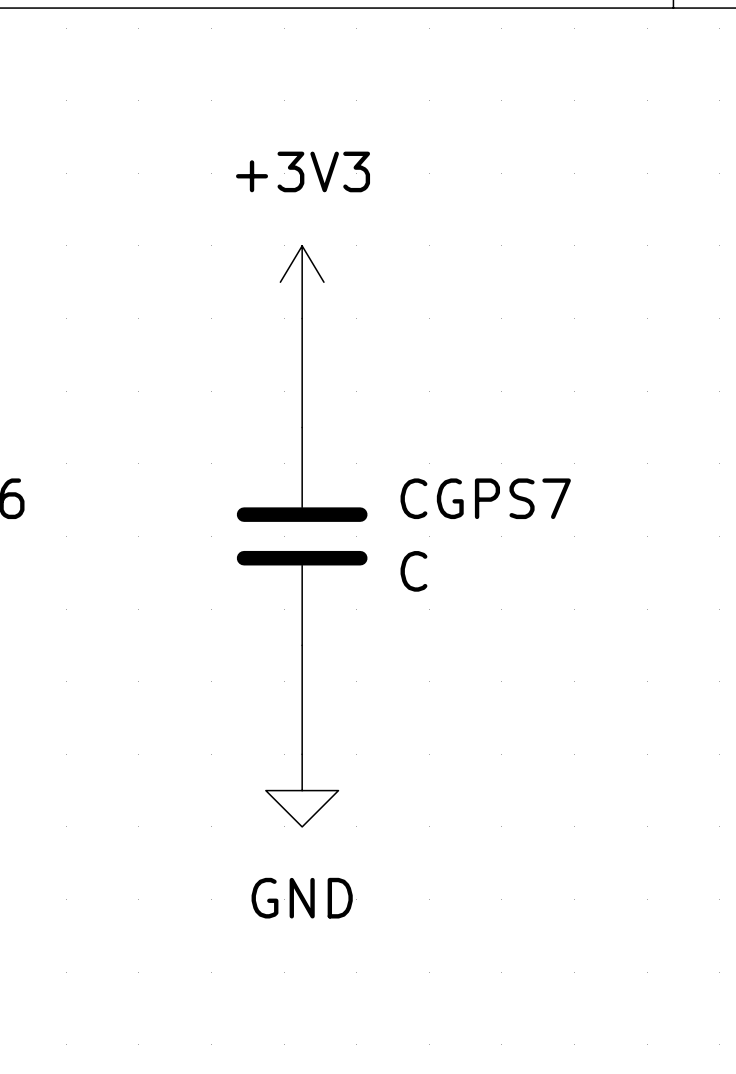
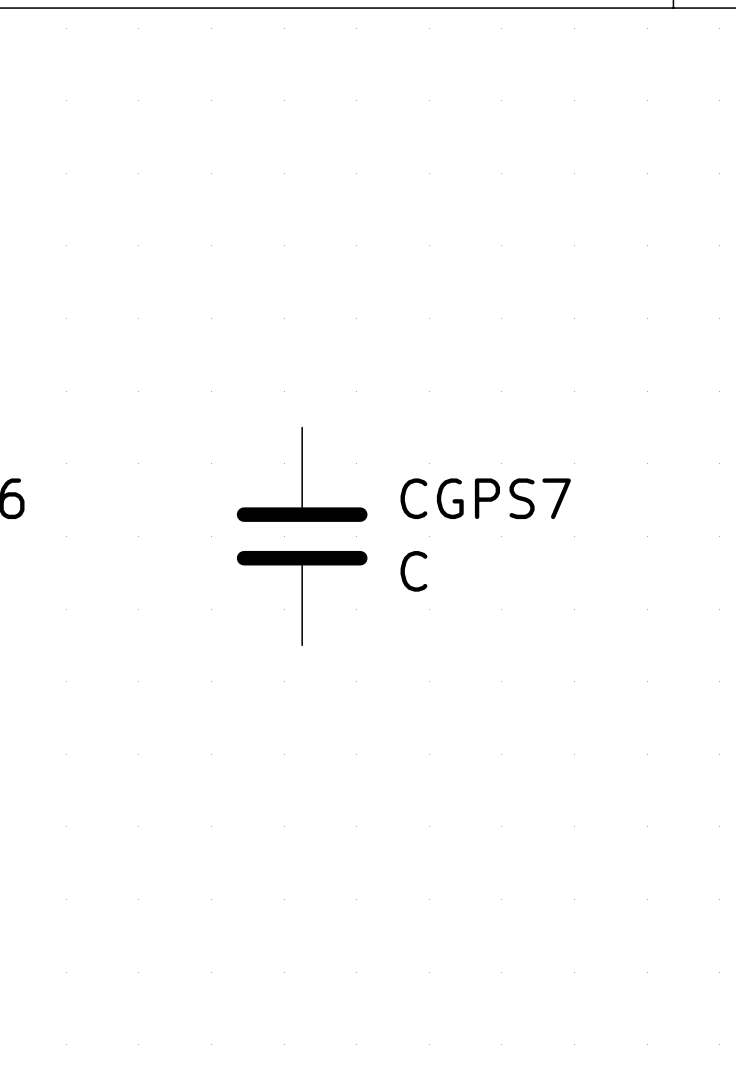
power symbol: +3V3 (302, 282) -> none
wire: (302, 318) (302, 427) -> none
wire: (302, 645) (302, 754) -> none
power symbol: GND (302, 790) -> none

